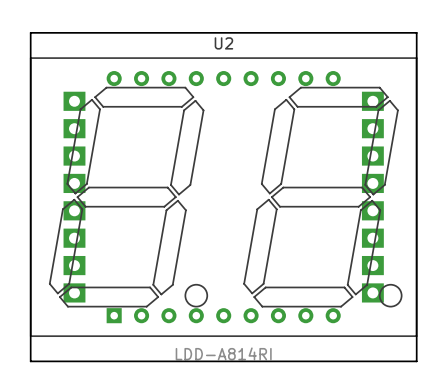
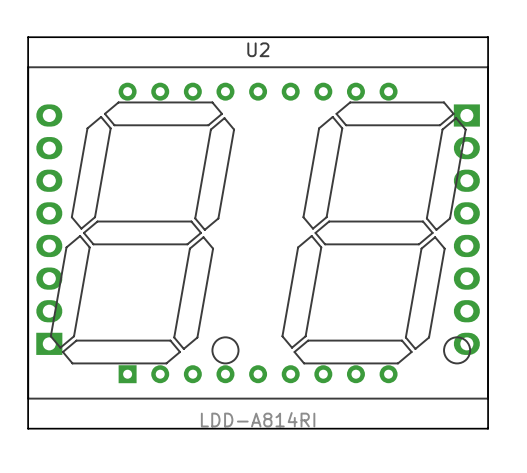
part: none -> (49, 229)
part: none -> (466, 229)
part: (74, 197) -> none
part: (372, 197) -> none

